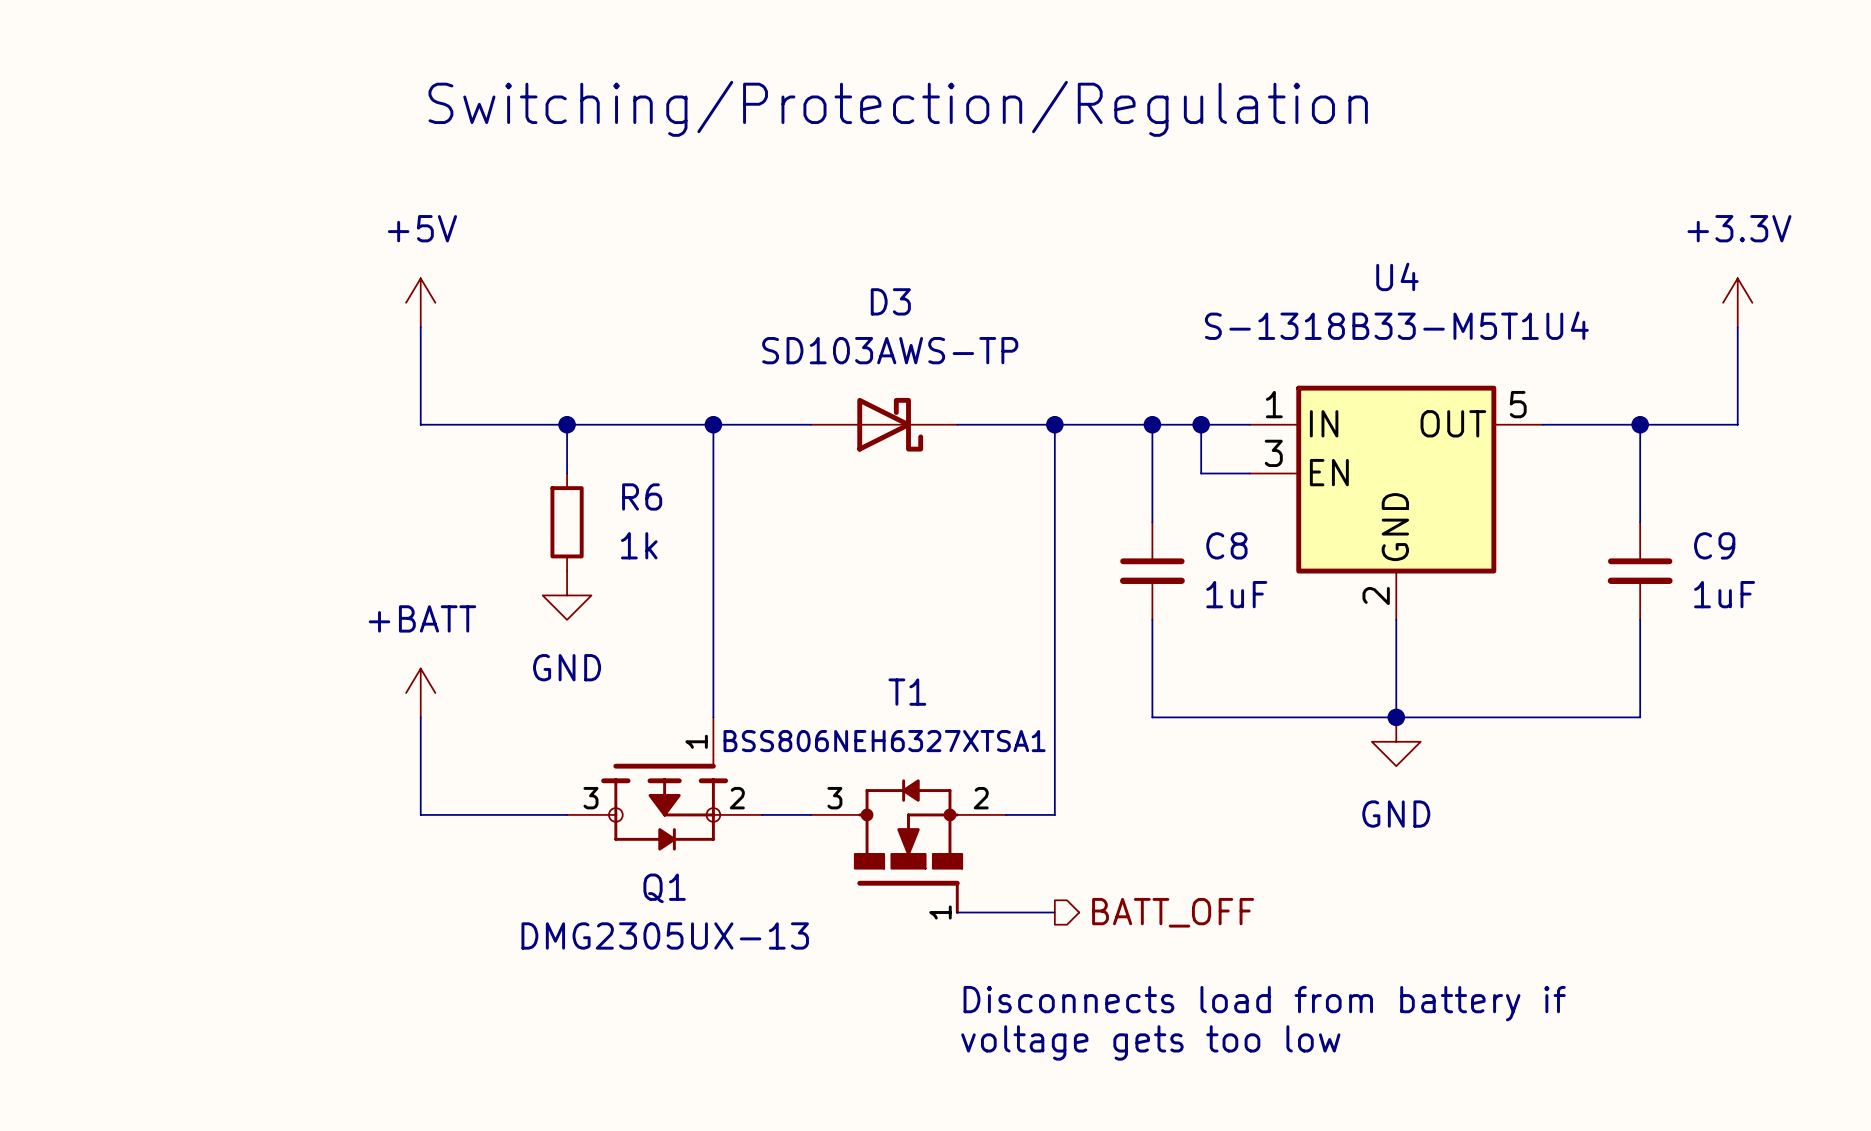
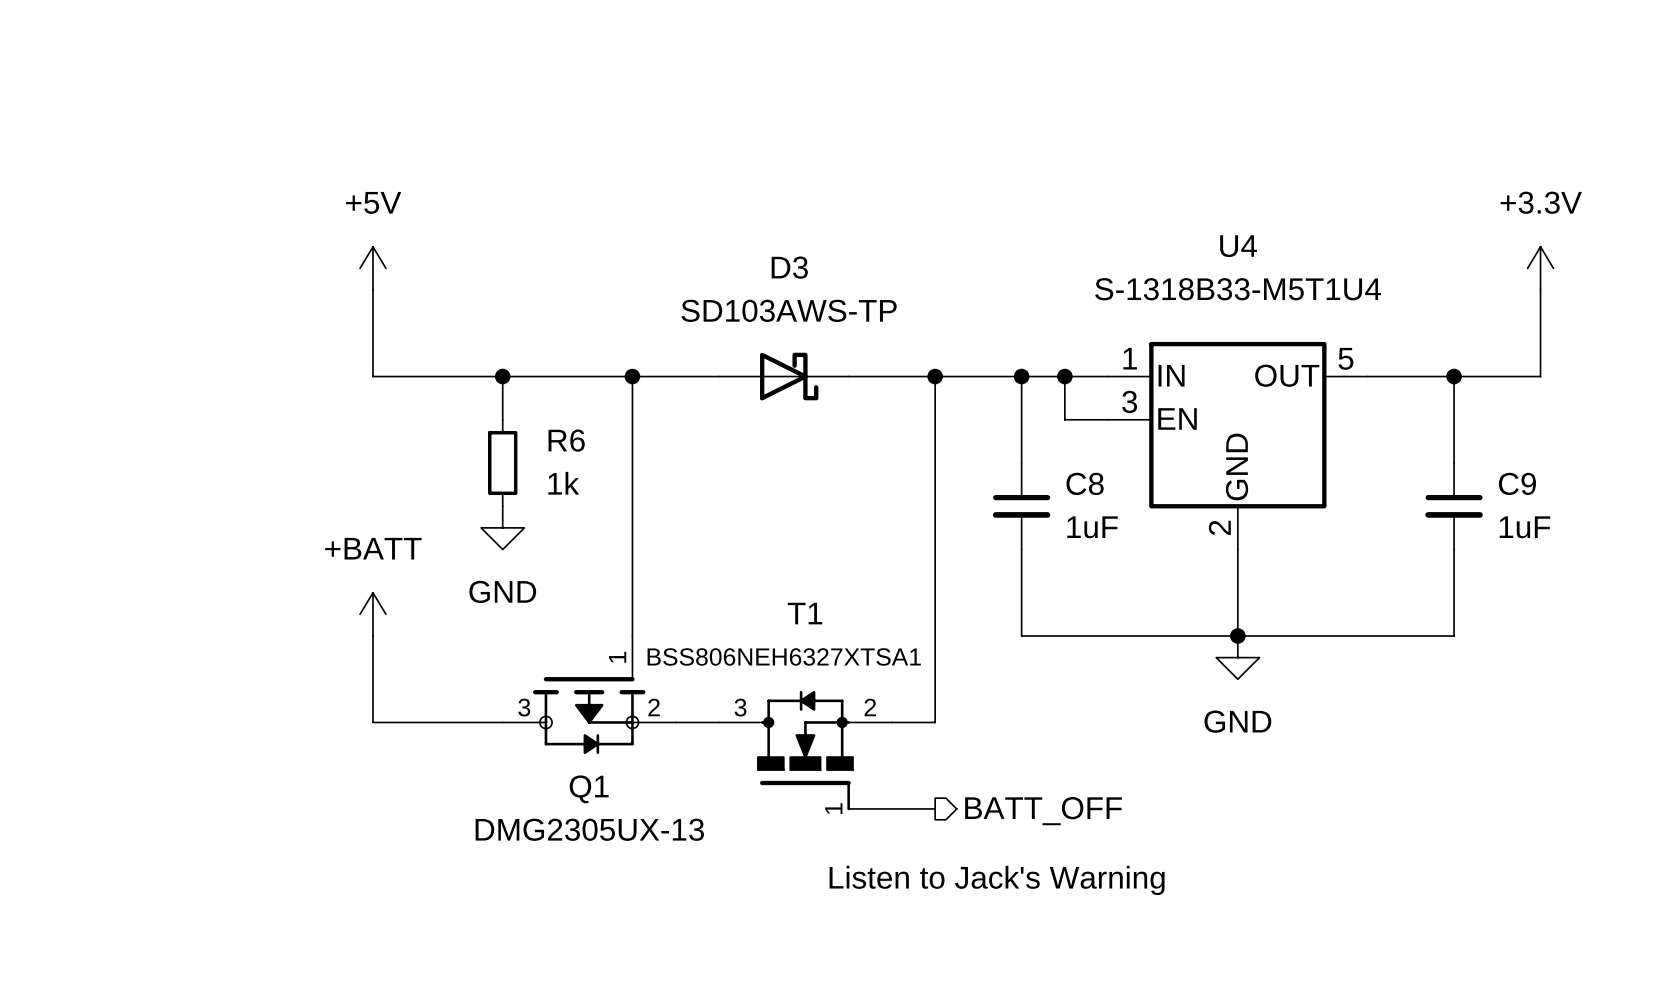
text: Switching/Protection/Regulation (898, 108) -> none
text: none -> Listen to Jack's Warning (997, 880)
text: Disconnects load from battery if (1264, 1003) -> none
text: voltage gets too low (1150, 1042) -> none

